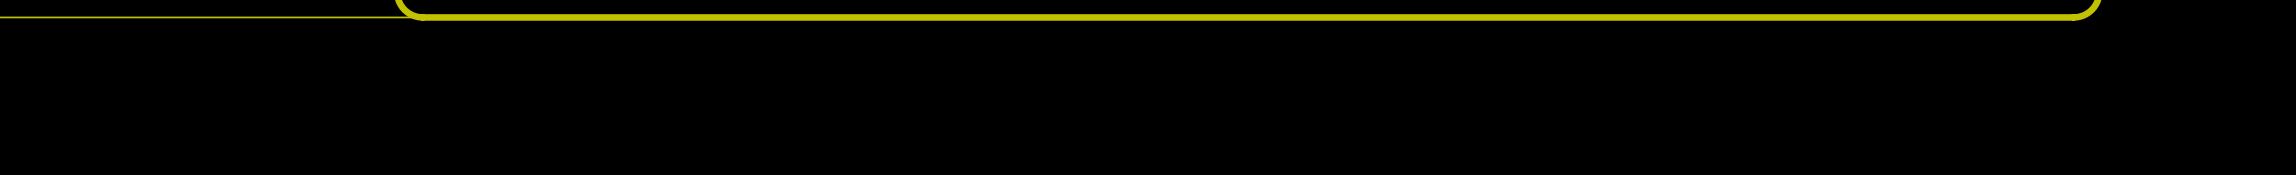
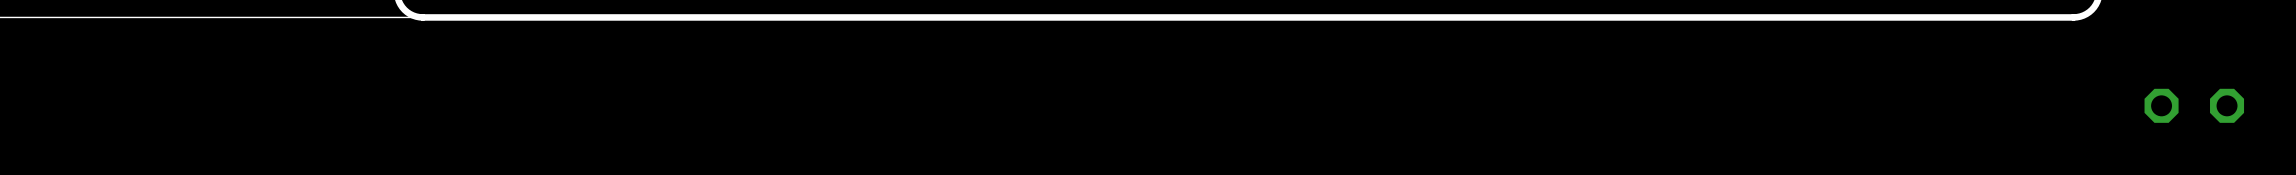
part: none -> (2194, 105)

